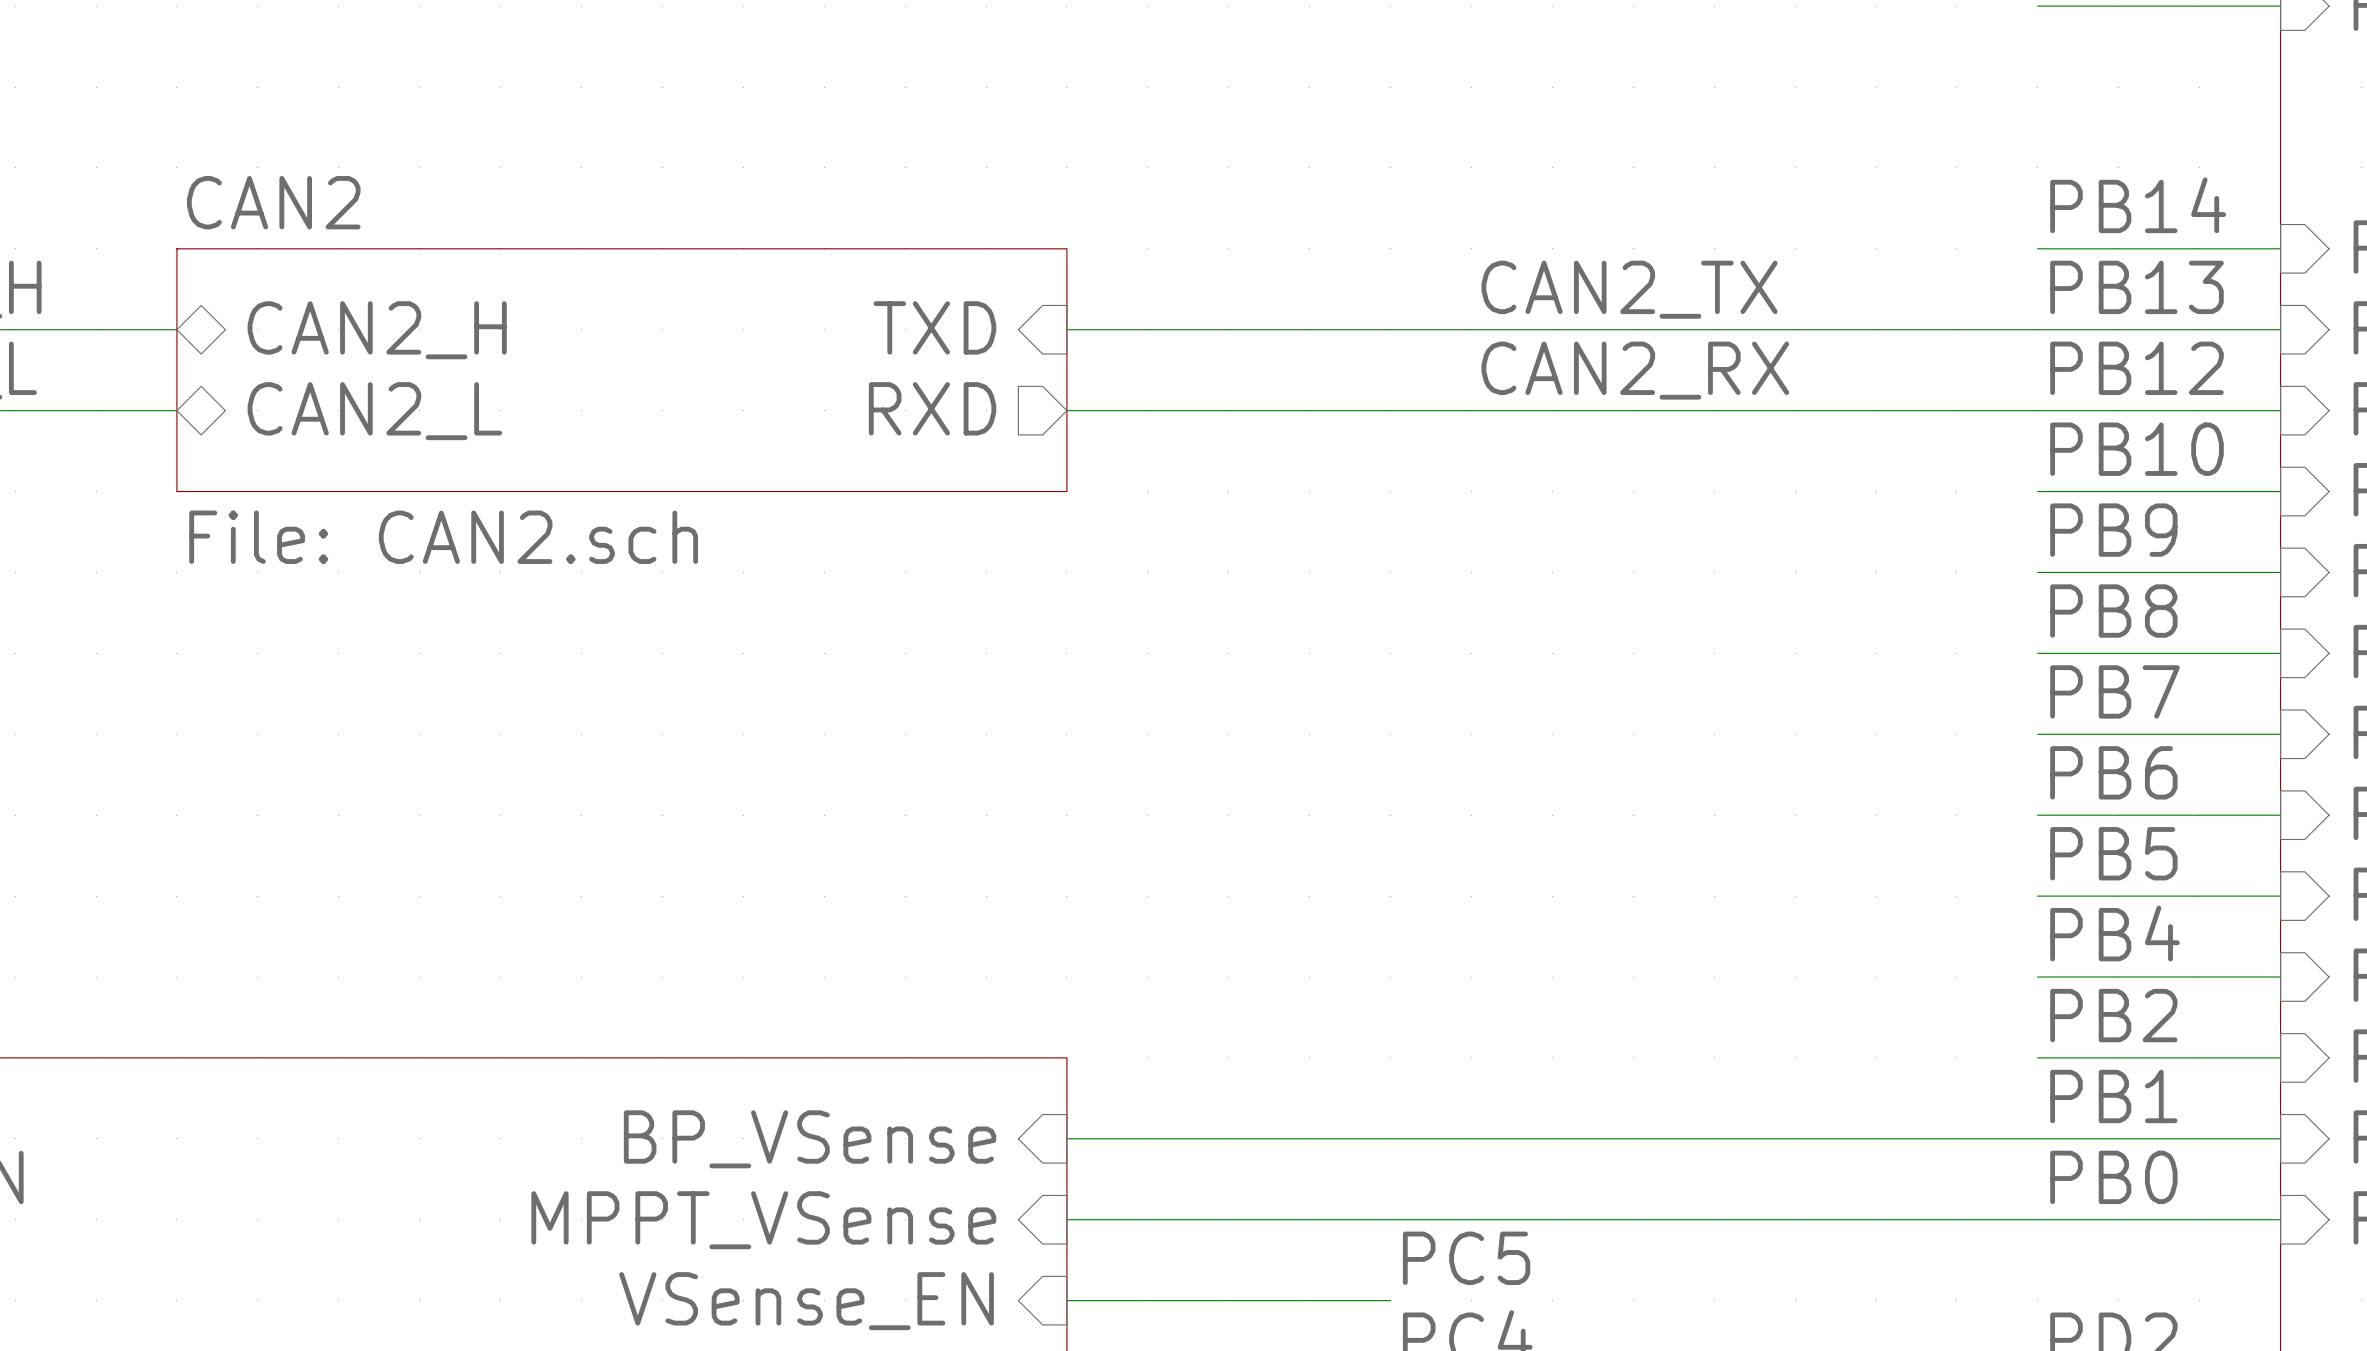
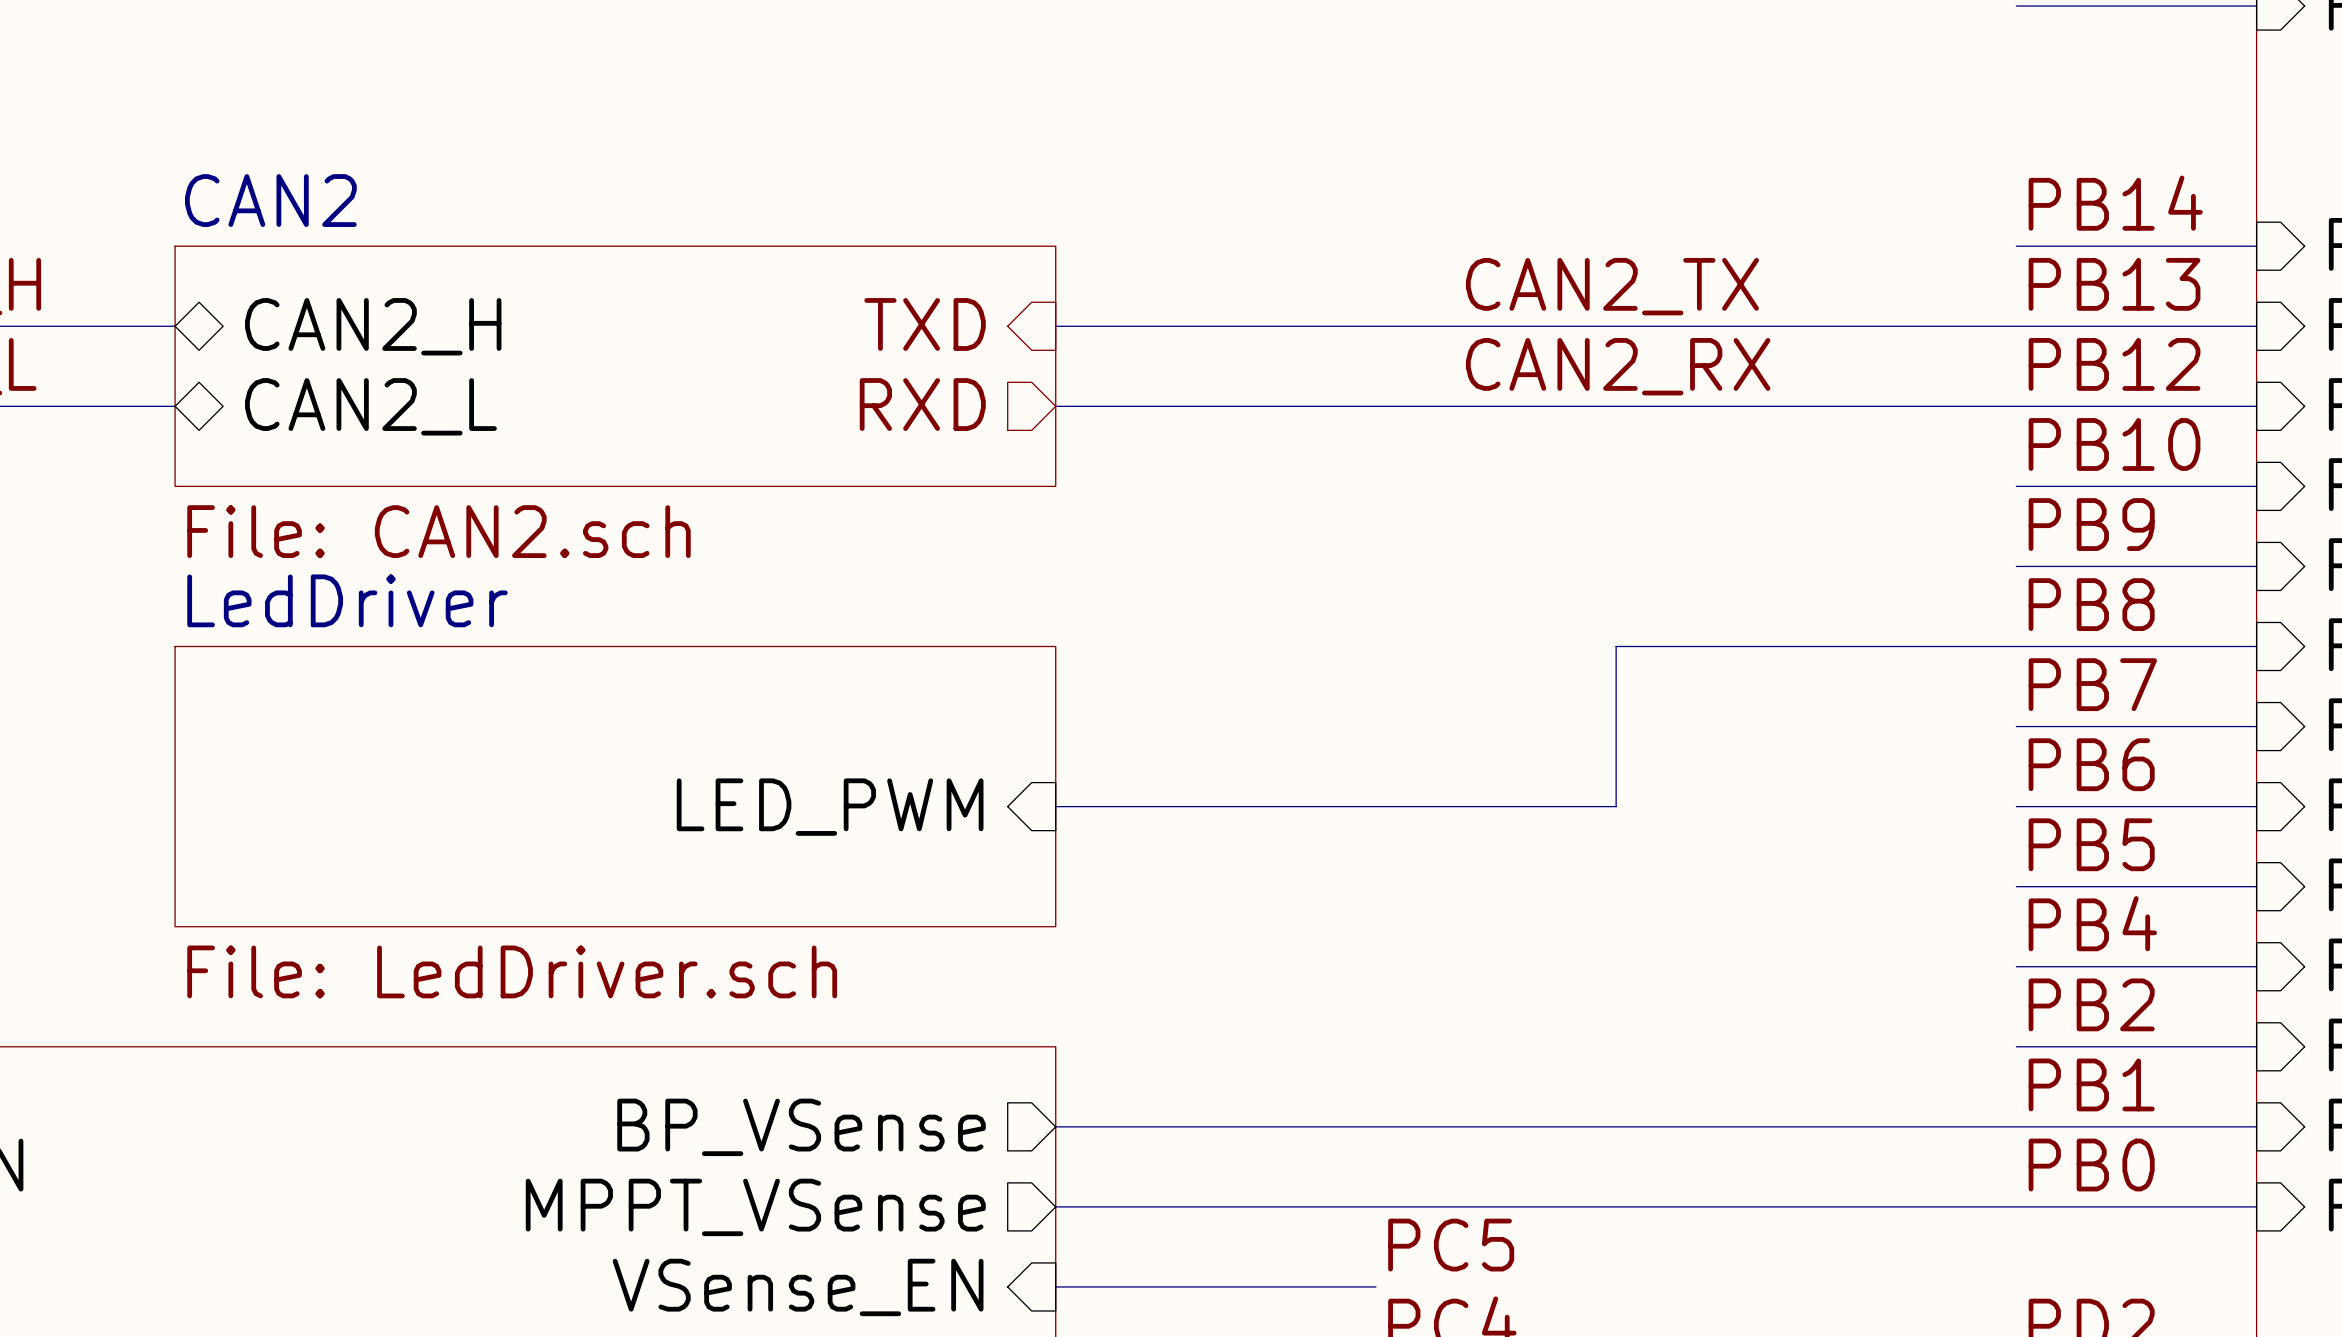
wire: none -> (2016, 646) (1616, 646) (1616, 806) (1055, 806)
sheet LedDriver: none -> File: LedDriver.sch (615, 786)
sheet pin: none -> LED_PWM (830, 807)
sheet pin shape: input (810, 1139) -> output (801, 1127)
sheet pin shape: input (763, 1220) -> output (755, 1207)

